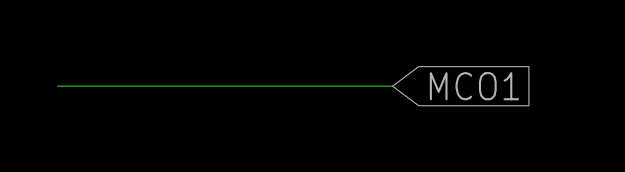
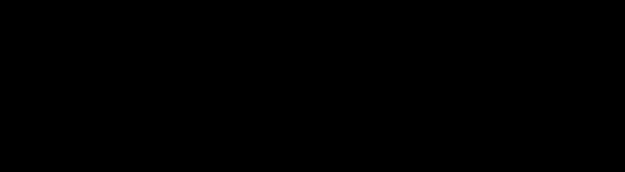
wire: (57, 86) (392, 86) -> none
global label: MCO1 (474, 86) -> none

